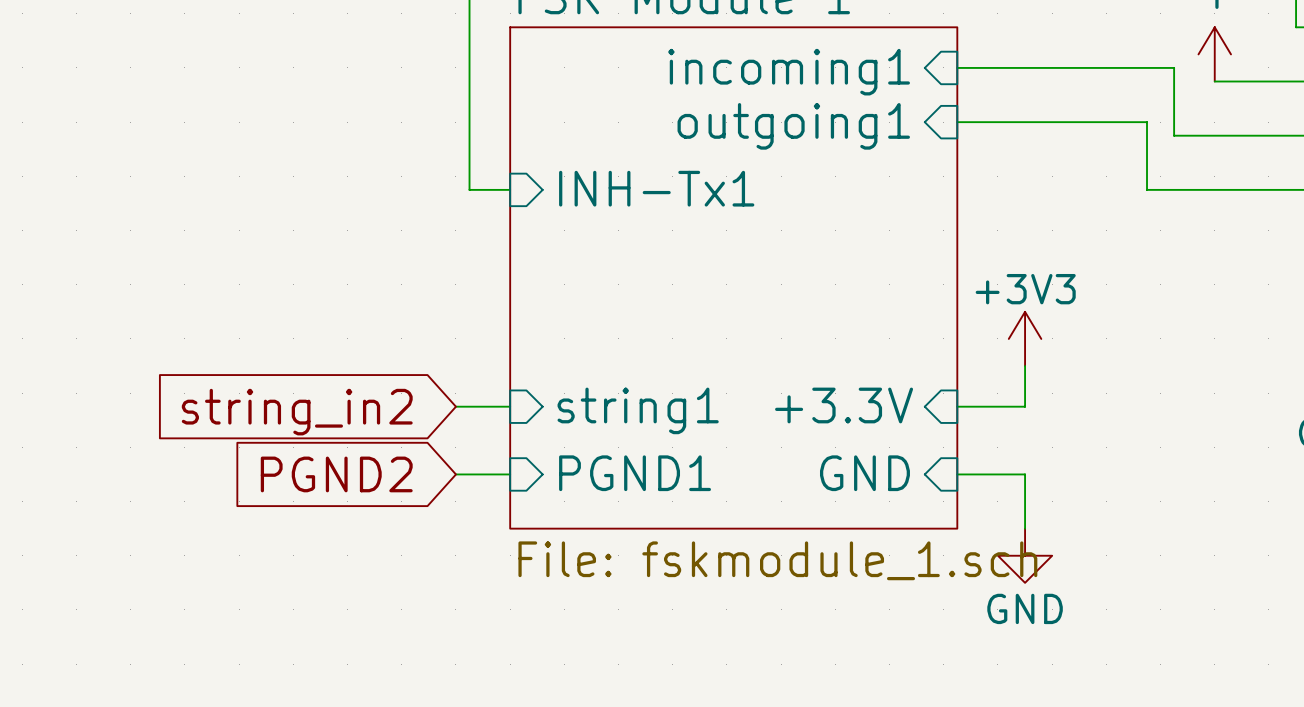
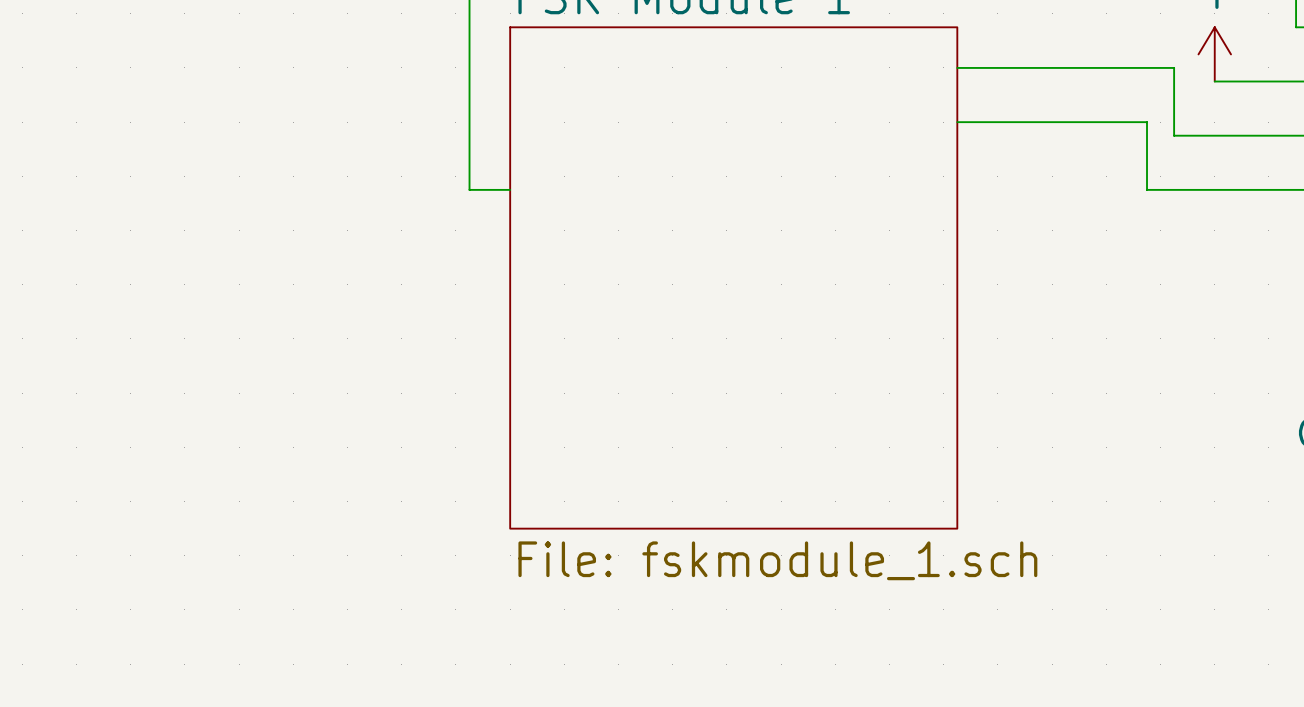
sheet pin: incoming1 (789, 72) -> none
sheet pin: outgoing1 (793, 126) -> none
sheet pin: INH-Tx1 (656, 188) -> none
power symbol: +3V3 (1025, 338) -> none
wire: (1025, 366) (1025, 406) (957, 406) -> none
sheet pin: +3.3V (844, 405) -> none
wire: (455, 406) (510, 406) -> none
sheet pin: string1 (638, 410) -> none
global label: string_in2 (297, 412) -> none
sheet pin: PGND1 (635, 473) -> none
sheet pin: GND (864, 473) -> none
global label: PGND2 (336, 474) -> none
wire: (455, 474) (510, 474) -> none
wire: (957, 474) (1025, 474) (1025, 528) -> none
power symbol: GND (1025, 555) -> none

